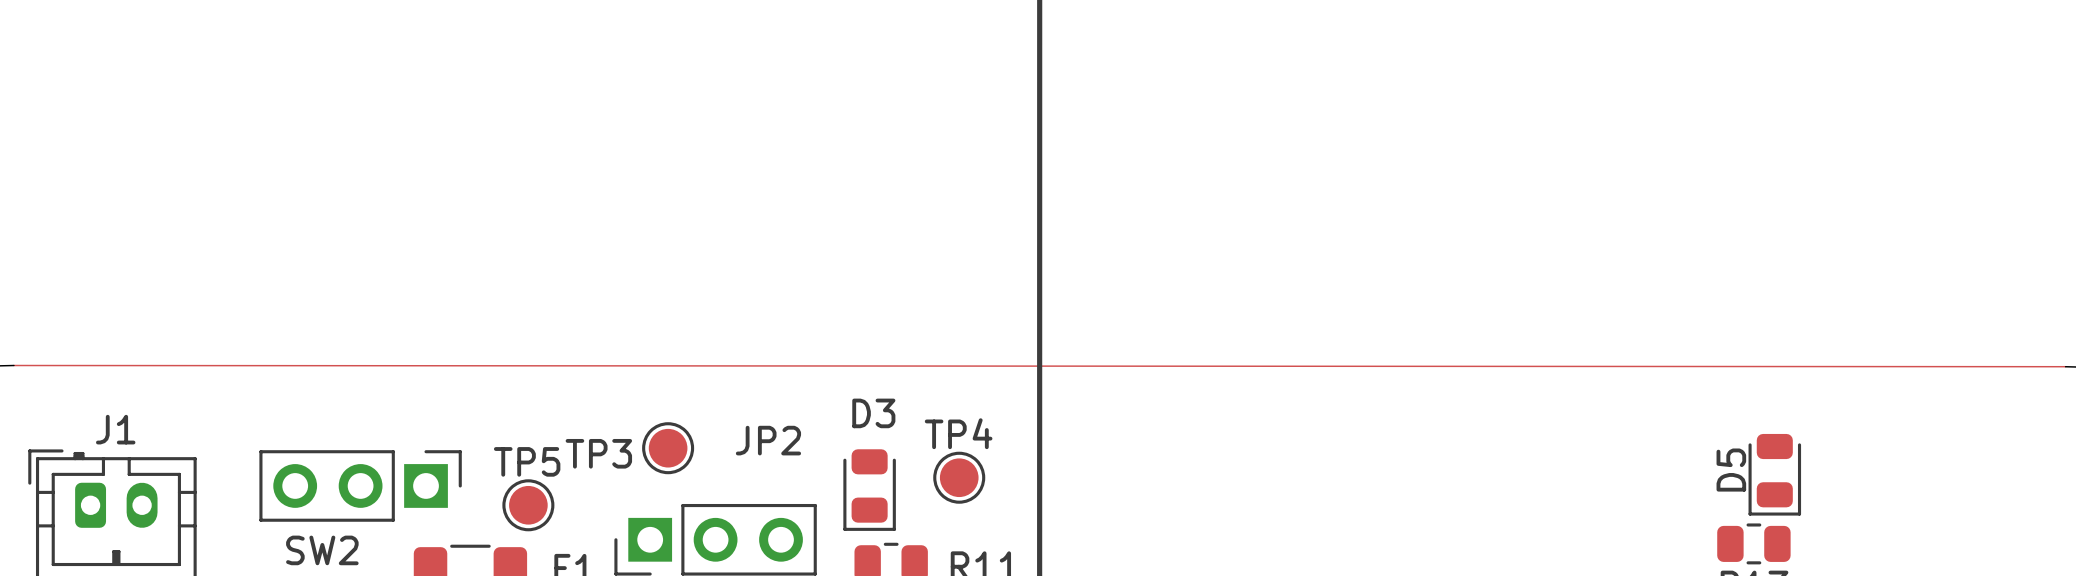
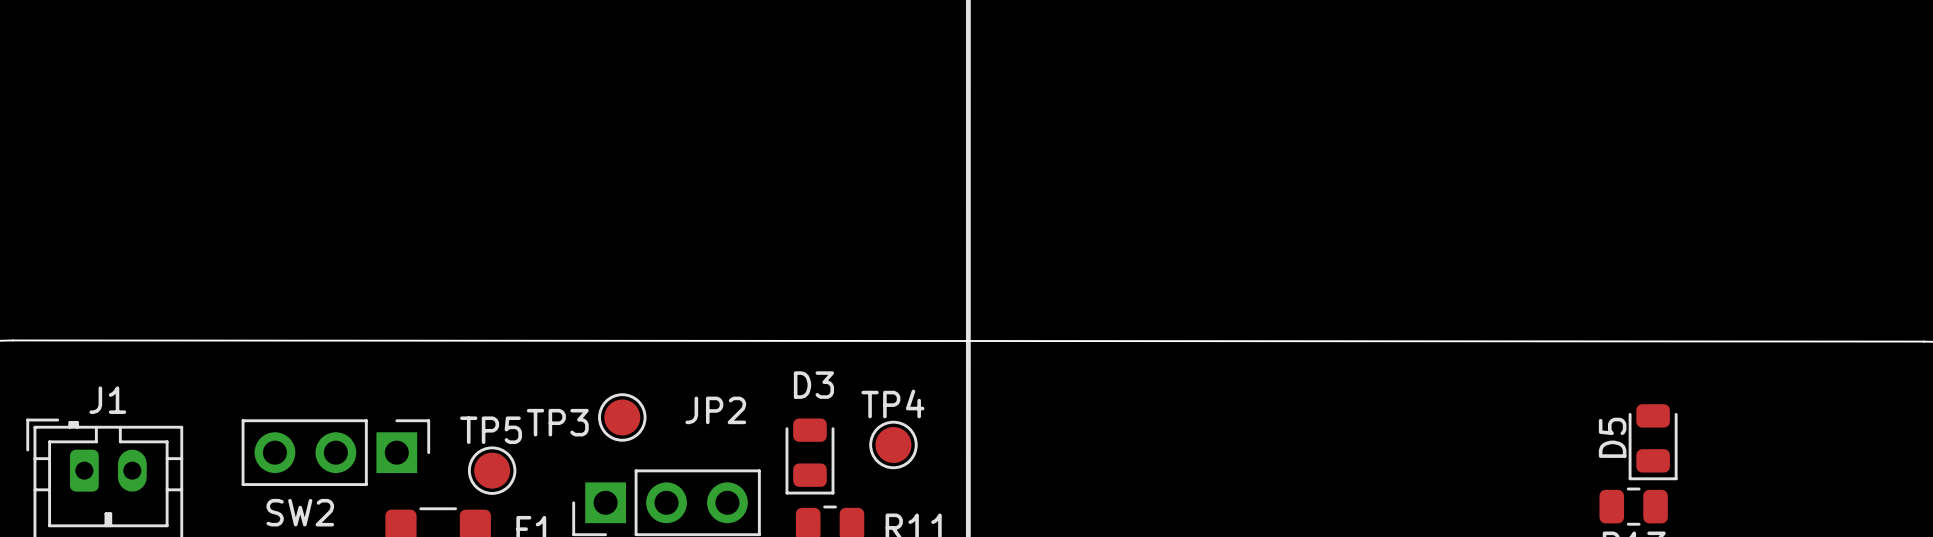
top track: (13, 365) (2065, 366) -> none
board edge: none -> (13, 340) (1923, 341)

